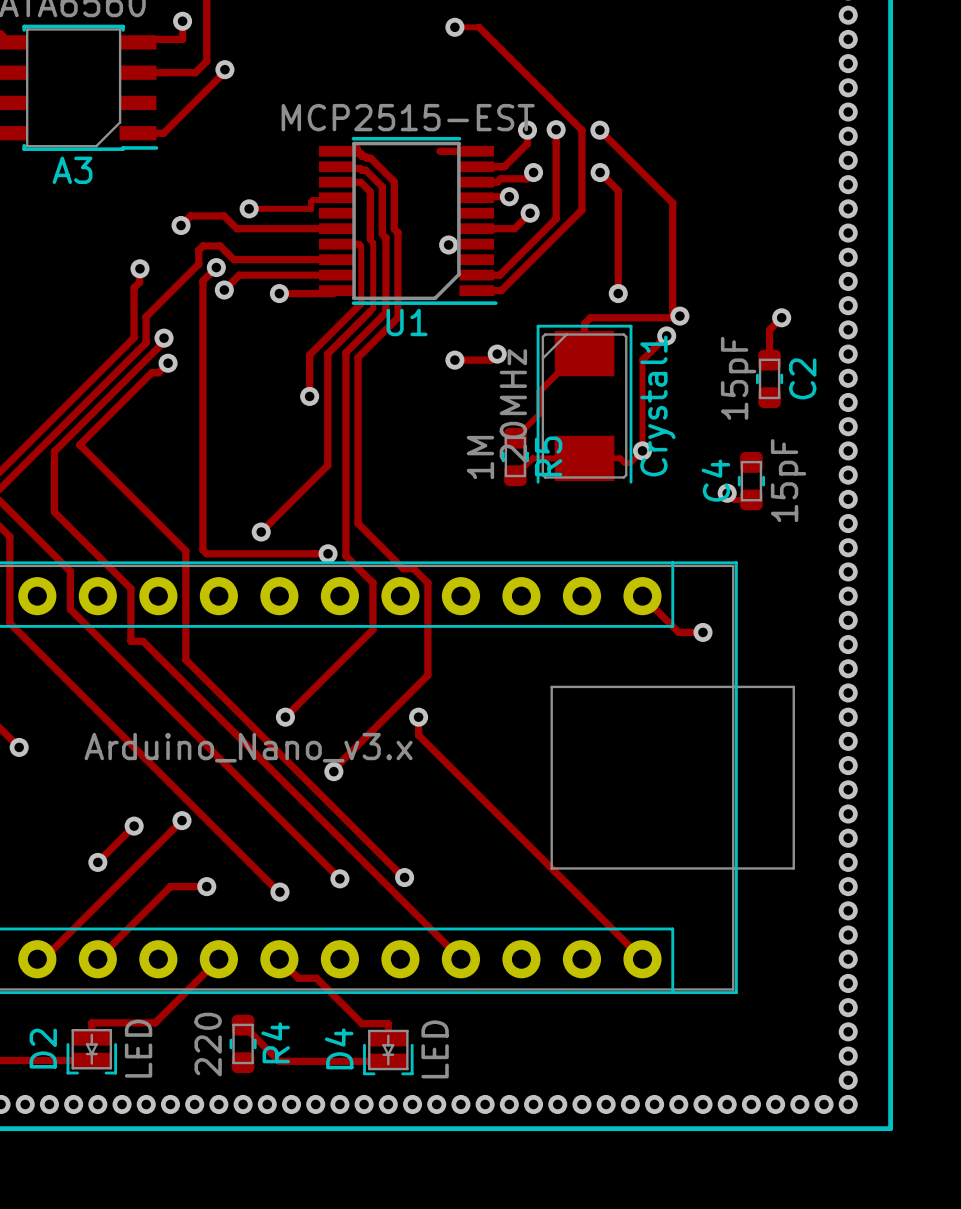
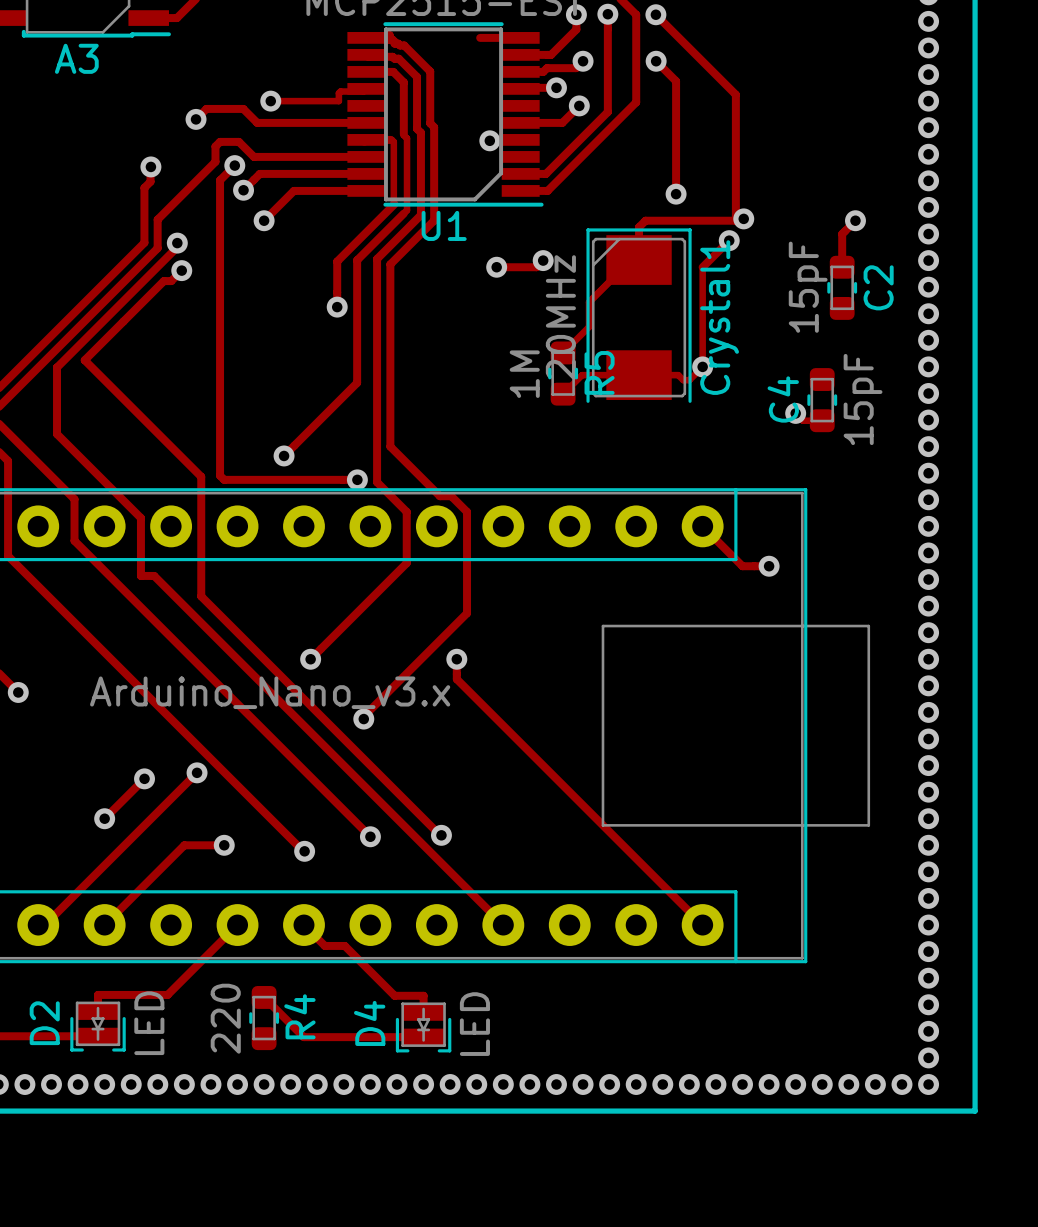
track: (336, 290) (333, 293) (279, 293) -> (366, 190) (293, 190) (264, 220)
via position: (279, 293) -> (264, 220)

